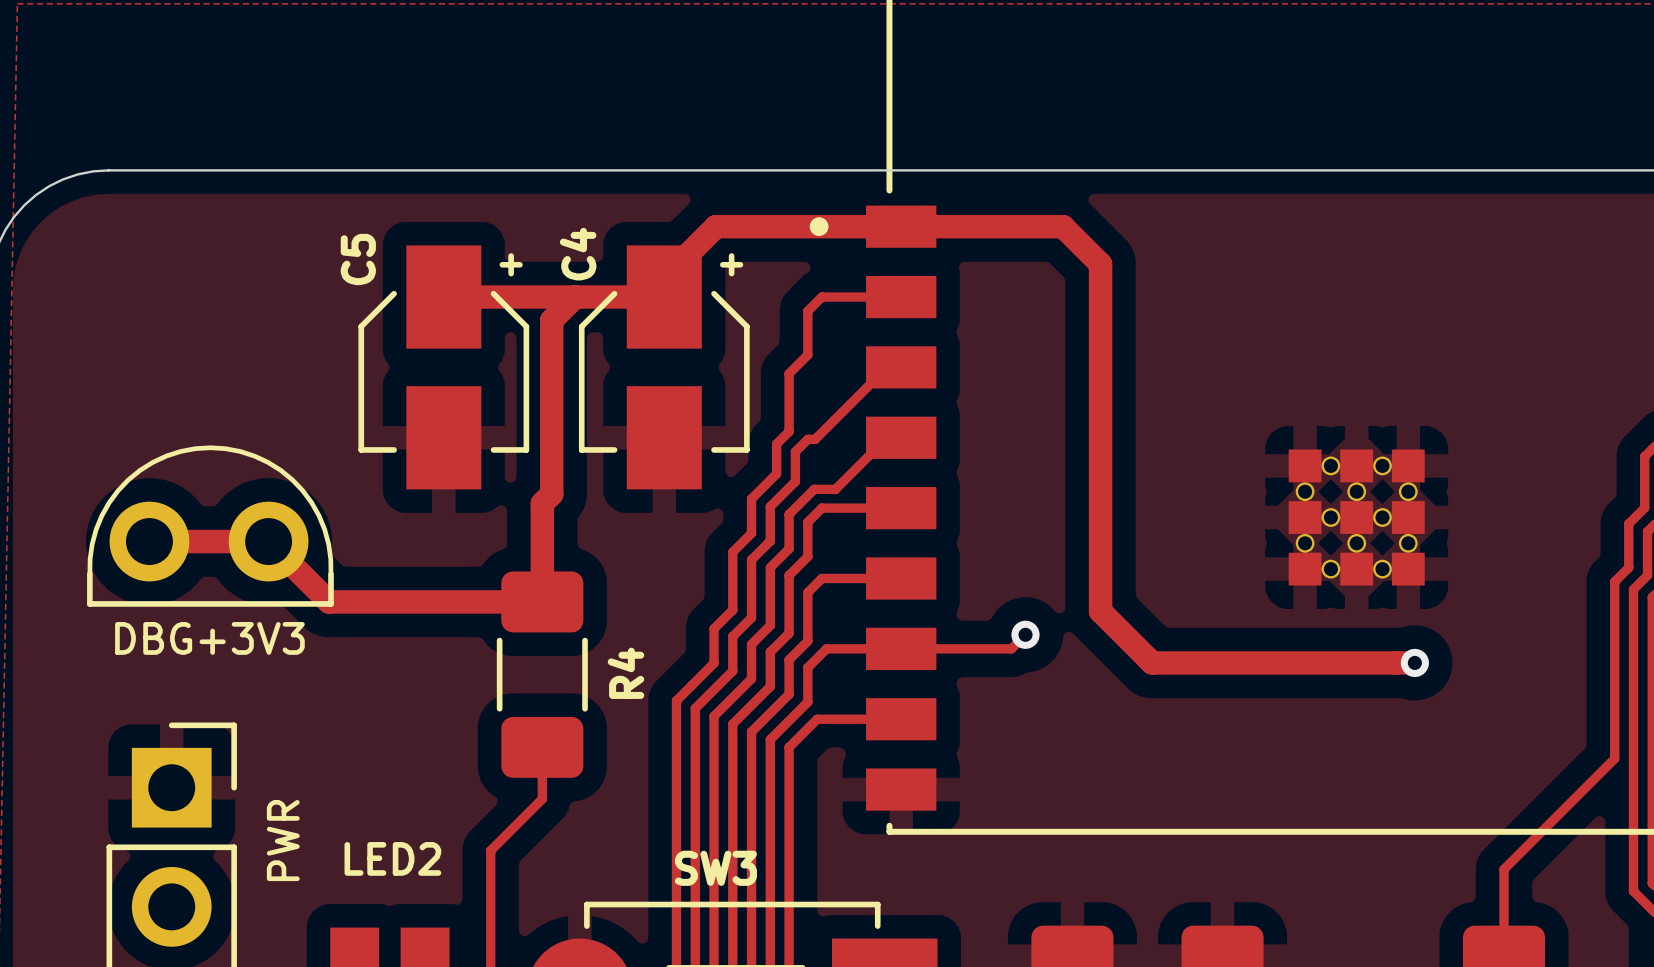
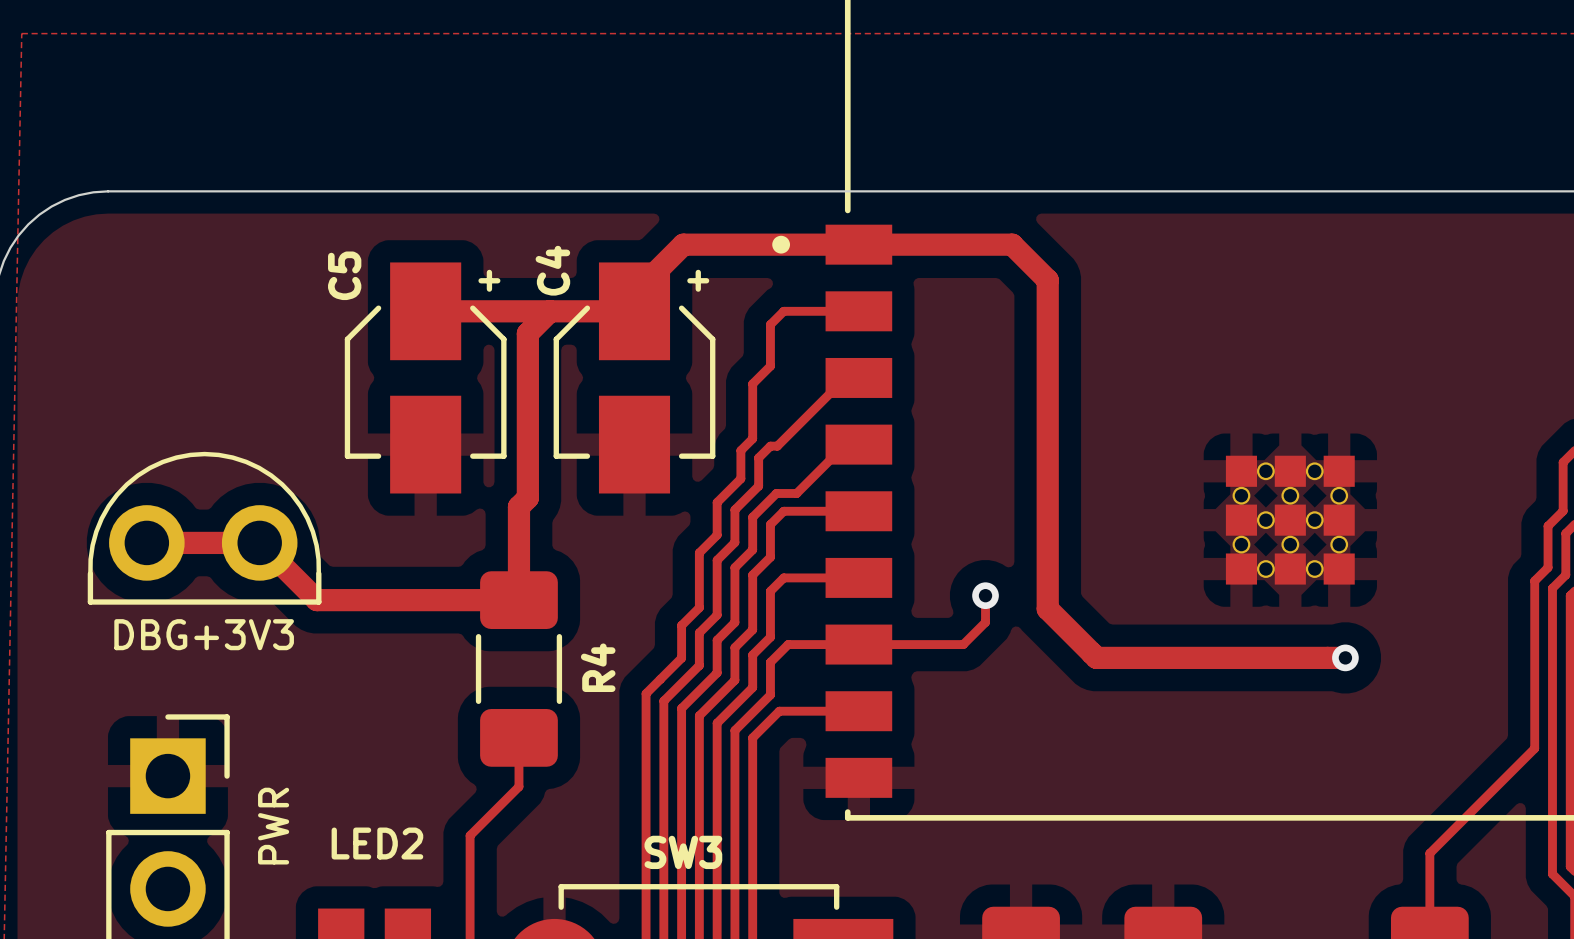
track: none -> (985, 595) (985, 622) (976, 631)
via position: (1025, 634) -> (985, 595)

